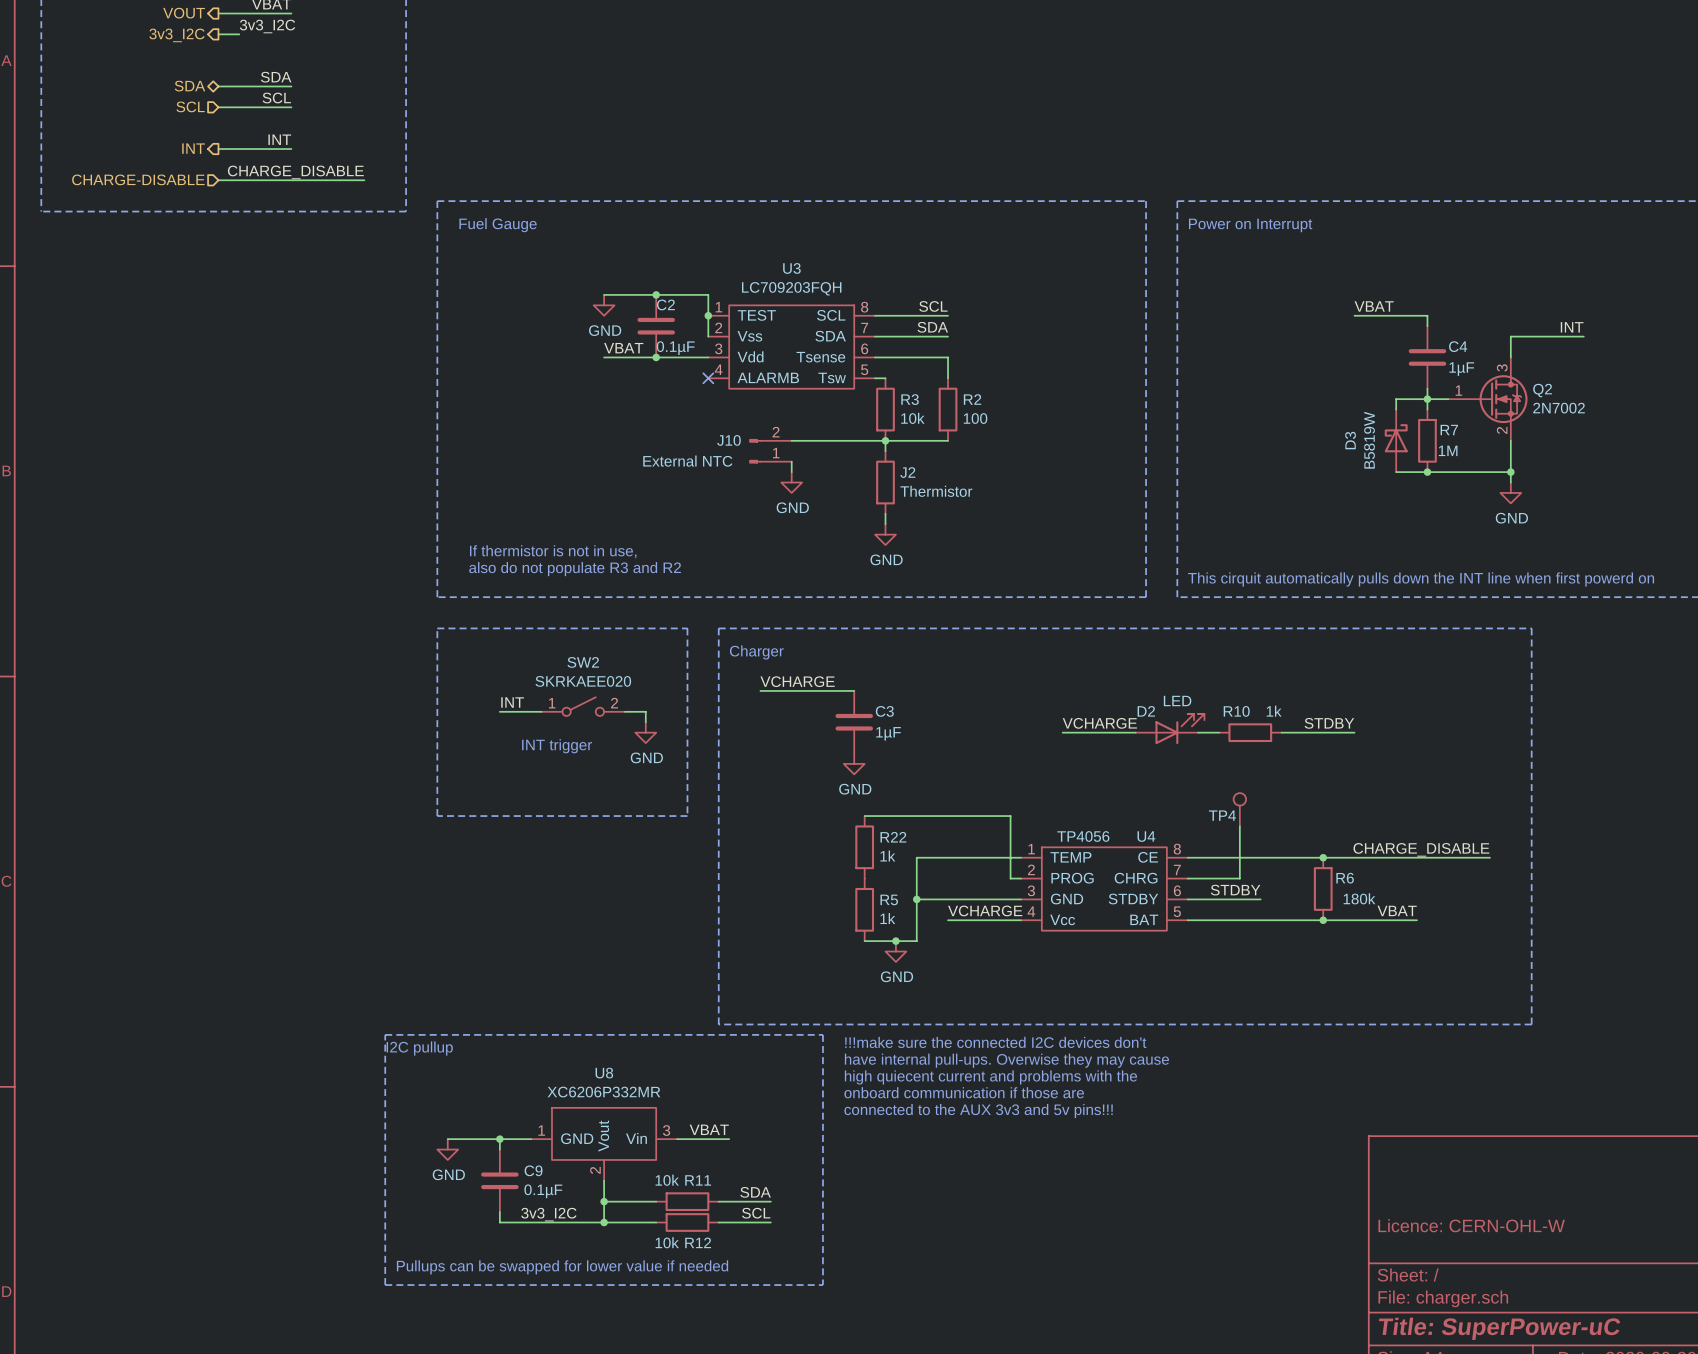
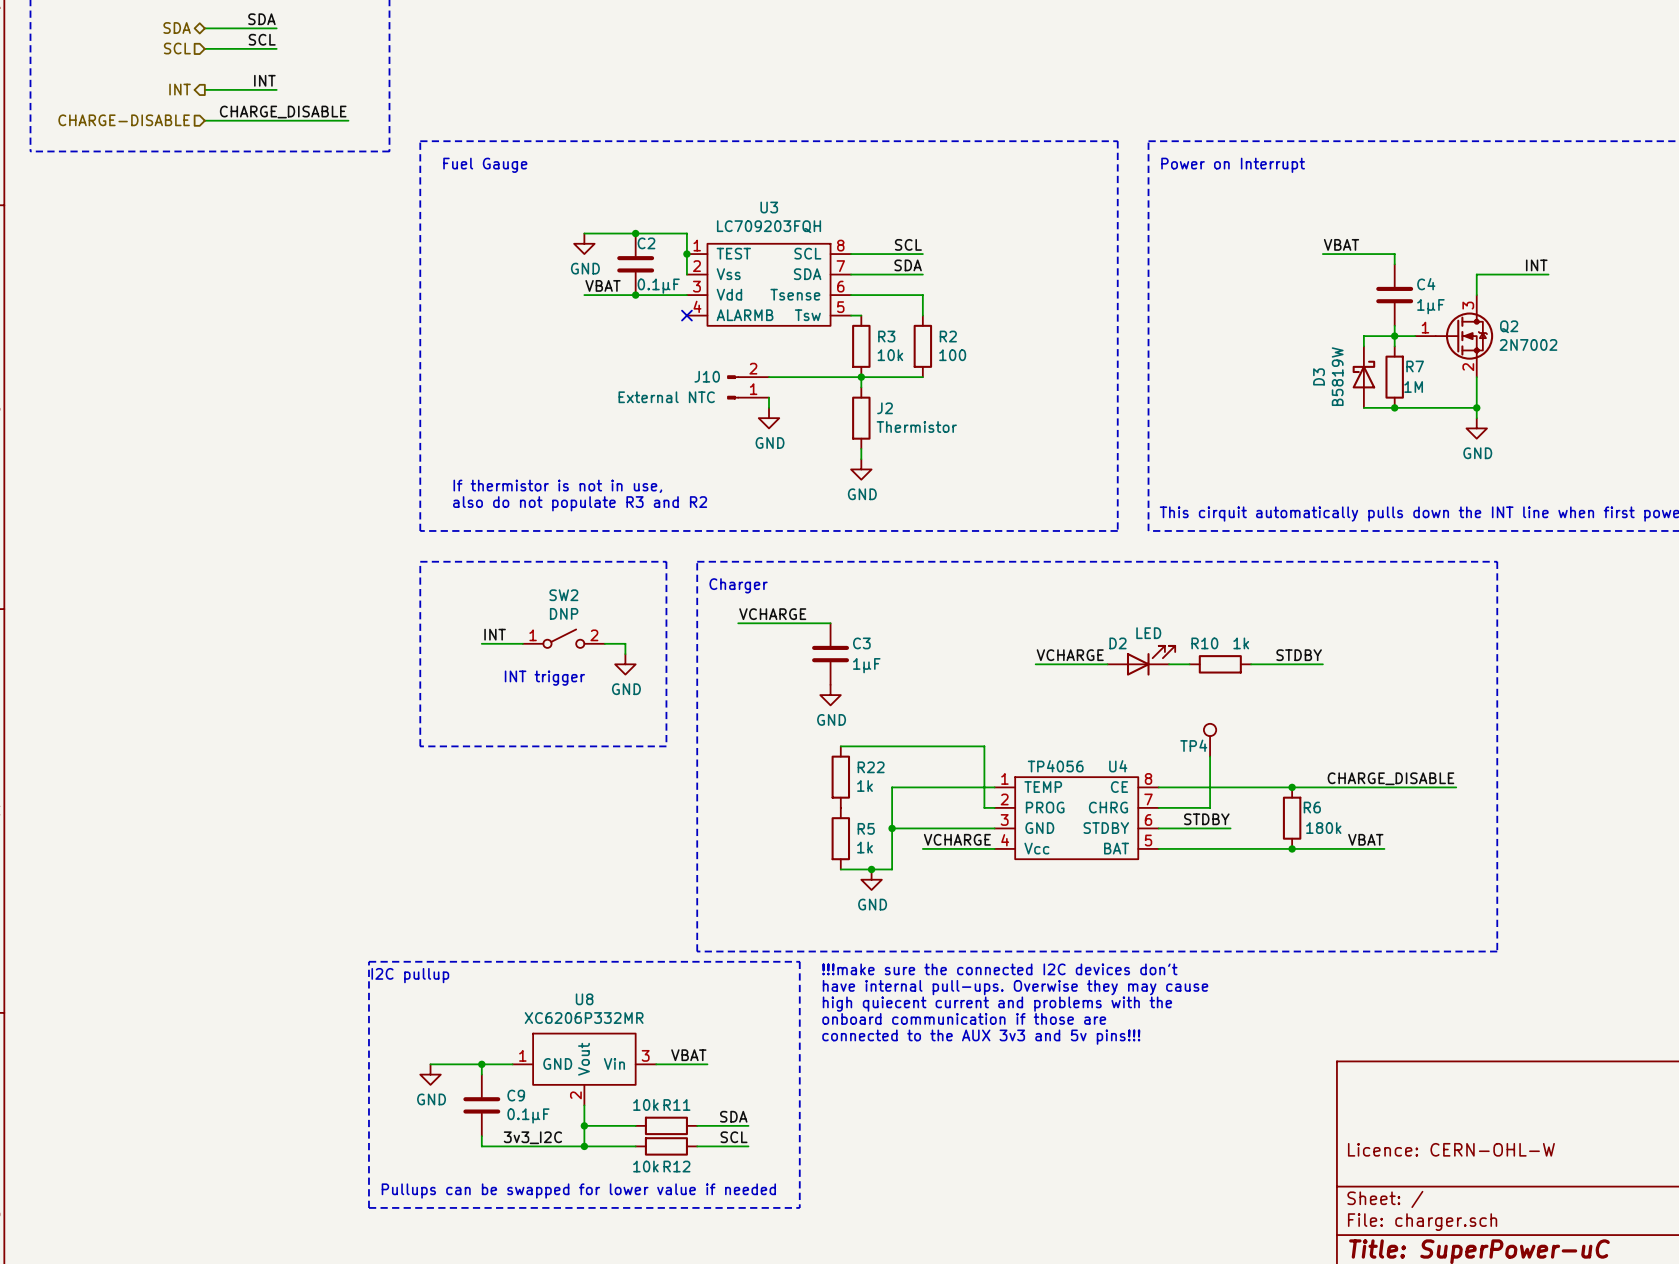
SW2 value: SKRKAEE020 (583, 681) -> DNP (564, 613)

